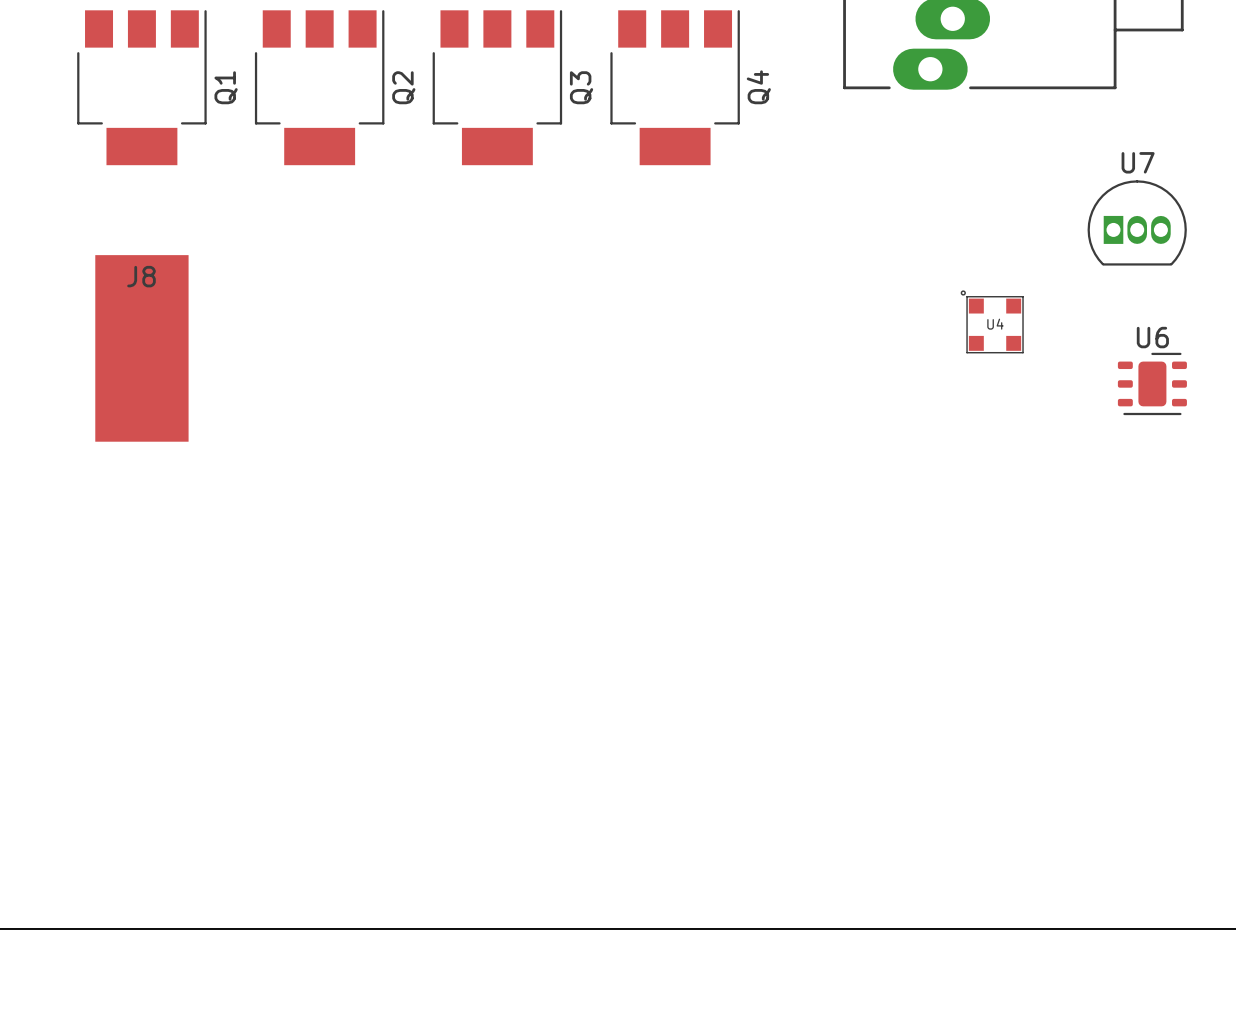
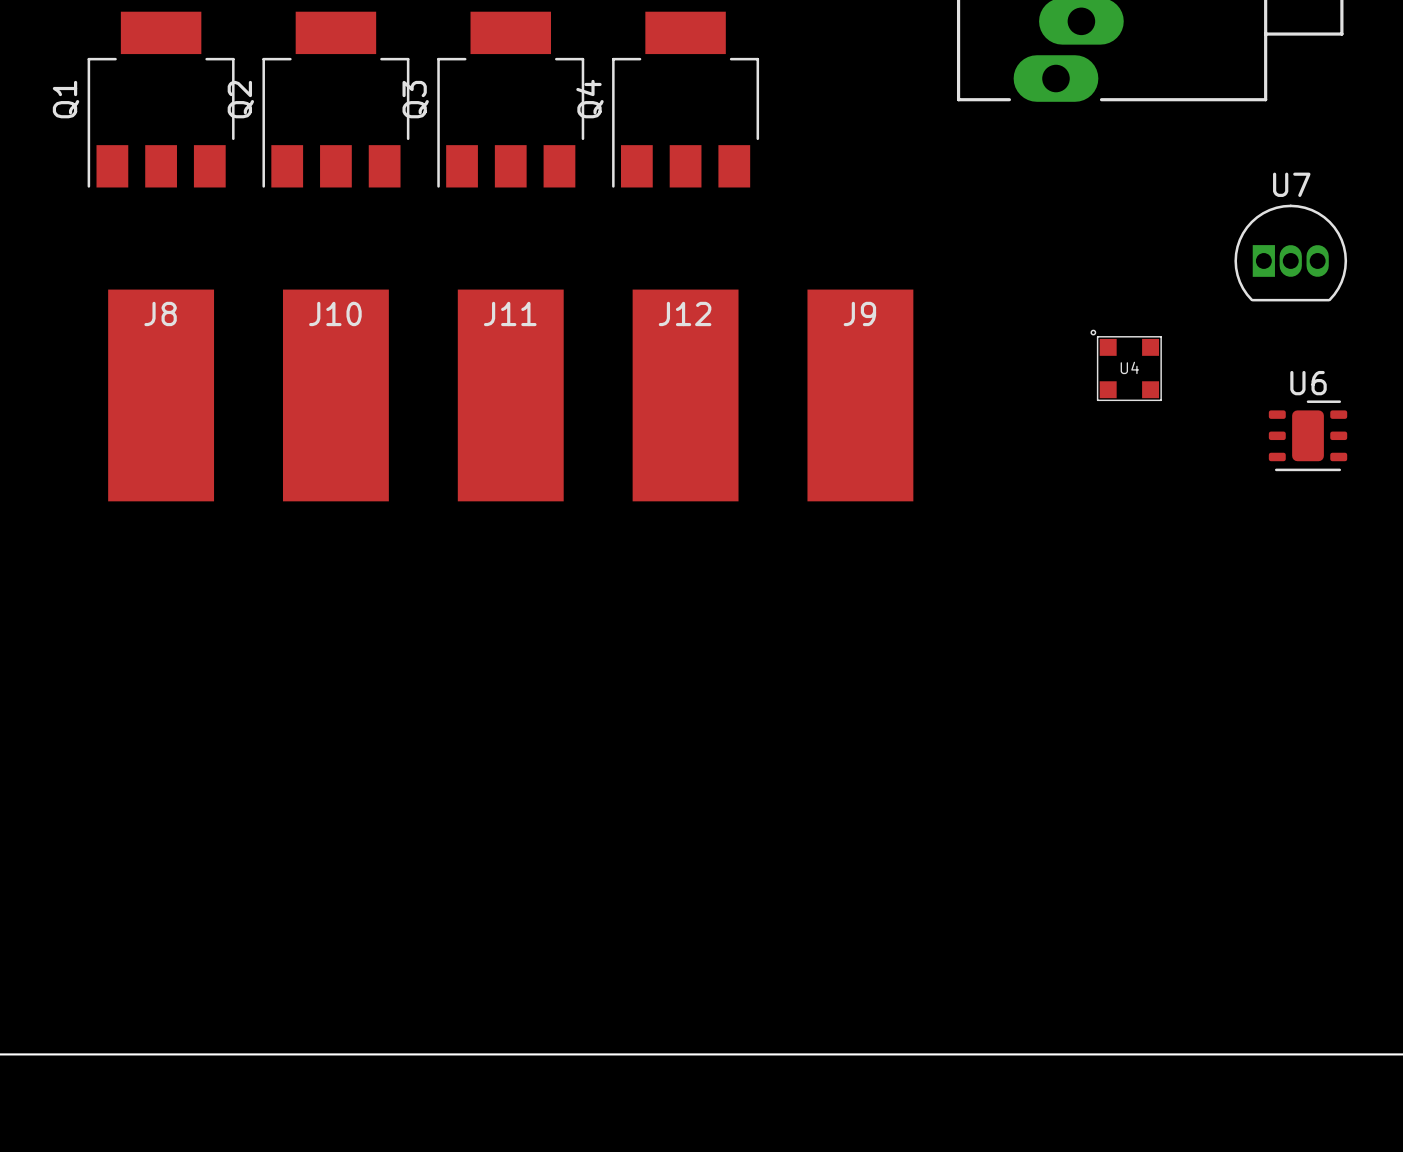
Q1 rotation: 0° (141, 87) -> 180° (161, 99)
Q2 rotation: 0° (319, 87) -> 180° (335, 99)
Q3 rotation: 0° (497, 87) -> 180° (510, 99)
Q4 rotation: 0° (675, 87) -> 180° (685, 99)
J10: none -> (335, 395)
J11: none -> (510, 395)
J12: none -> (685, 395)
J9: none -> (860, 395)

